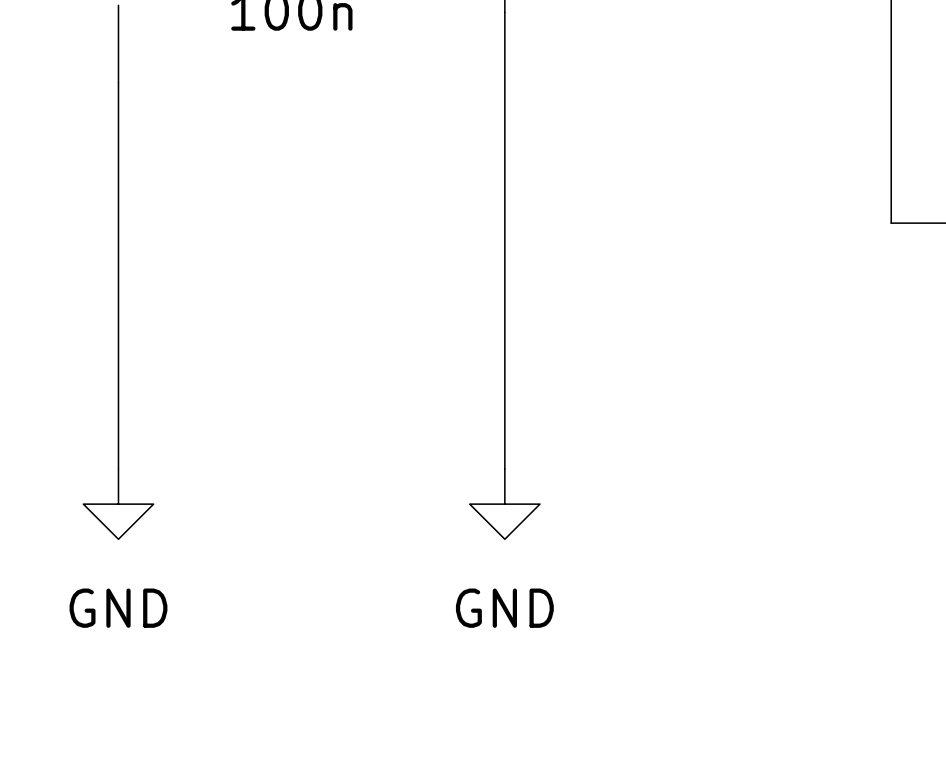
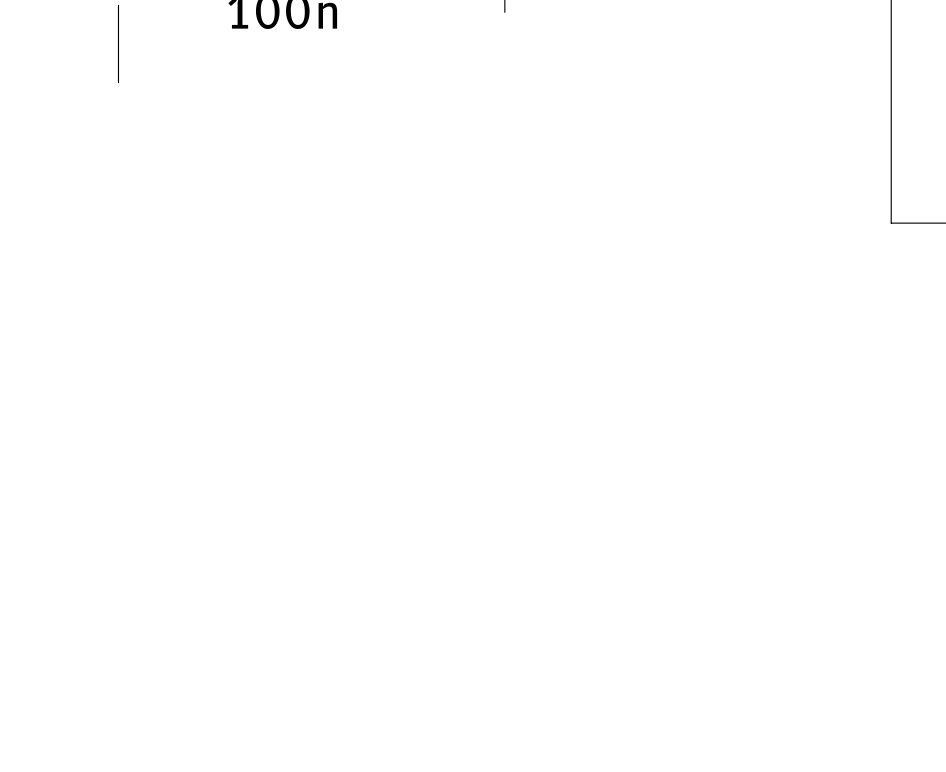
wire: (504, 12) (504, 469) -> none
wire: (118, 82) (118, 469) -> none
power symbol: GND (118, 504) -> none
power symbol: GND (504, 504) -> none

